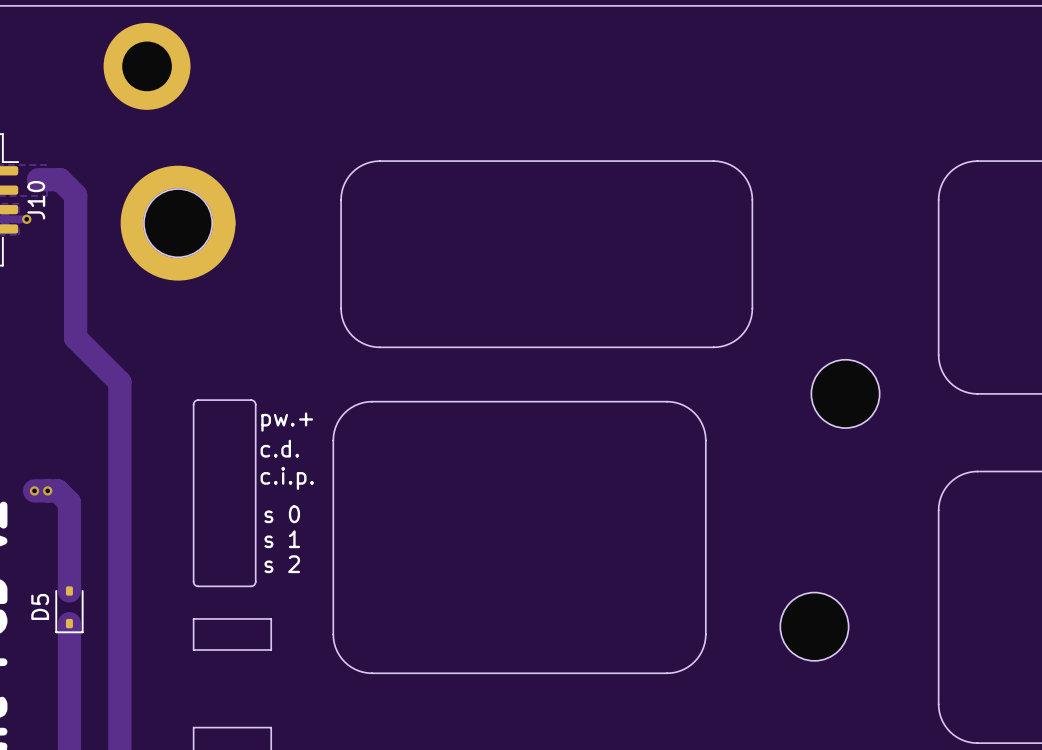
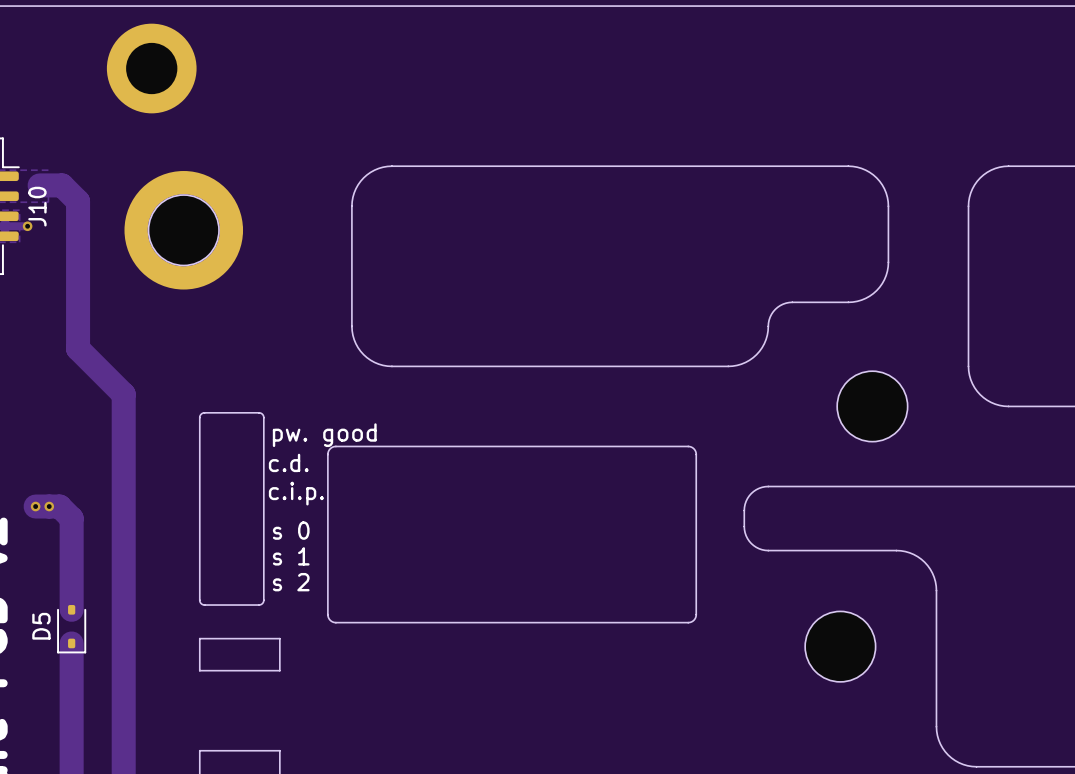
board edge: (713, 161) (726, 163) (741, 172) (748, 183) (752, 195) (751, 317) (741, 335) (726, 345) (713, 347) (375, 347) (363, 343) (352, 335) (344, 325) (341, 308) -> (736, 166) (852, 166) (861, 168) (873, 174) (882, 184) (888, 201) (888, 266) (886, 275) (879, 287) (869, 296) (857, 301) (792, 302) (780, 305) (770, 317) (766, 339) (759, 351) (745, 362) (732, 366) (387, 366) (374, 362) (360, 351) (352, 335) (351, 318)
board edge: (372, 401) (667, 401) (679, 403) (691, 410) (701, 423) (705, 440) (705, 634) (703, 647) (697, 658) (683, 669) (667, 673) (372, 673) (359, 671) (347, 664) (339, 655) (333, 638) (333, 436) (337, 423) (344, 413) (355, 405) (372, 401) -> (335, 446) (330, 448) (327, 454) (327, 614) (332, 622) (688, 622) (695, 617) (696, 454) (691, 447) (335, 446)
text: pw.+ (287, 422) -> pw. good (324, 435)
board edge: (977, 471) (964, 473) (950, 482) (942, 493) (938, 510) (938, 708) (942, 721) (953, 734) (964, 740) (977, 743) -> (1008, 486) (765, 486) (756, 489) (749, 495) (744, 510) (746, 535) (751, 543) (762, 549) (900, 550) (913, 554) (924, 562) (932, 573) (936, 586) (936, 726) (938, 739) (948, 755) (963, 764) (976, 766) (1008, 766)

